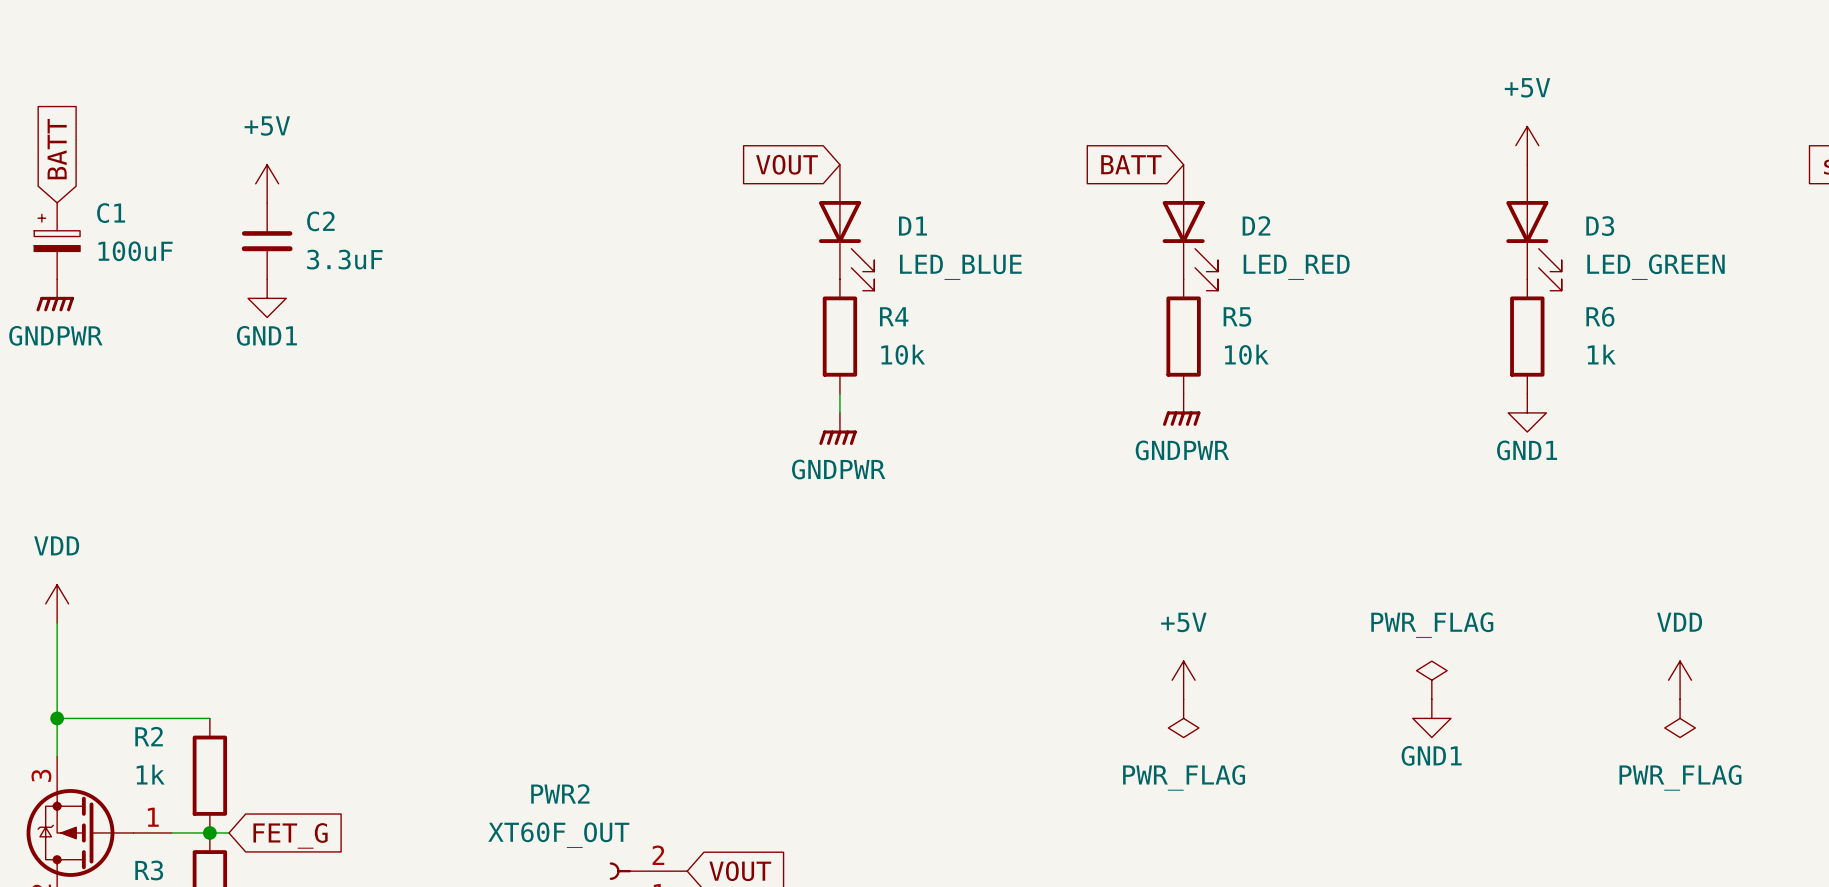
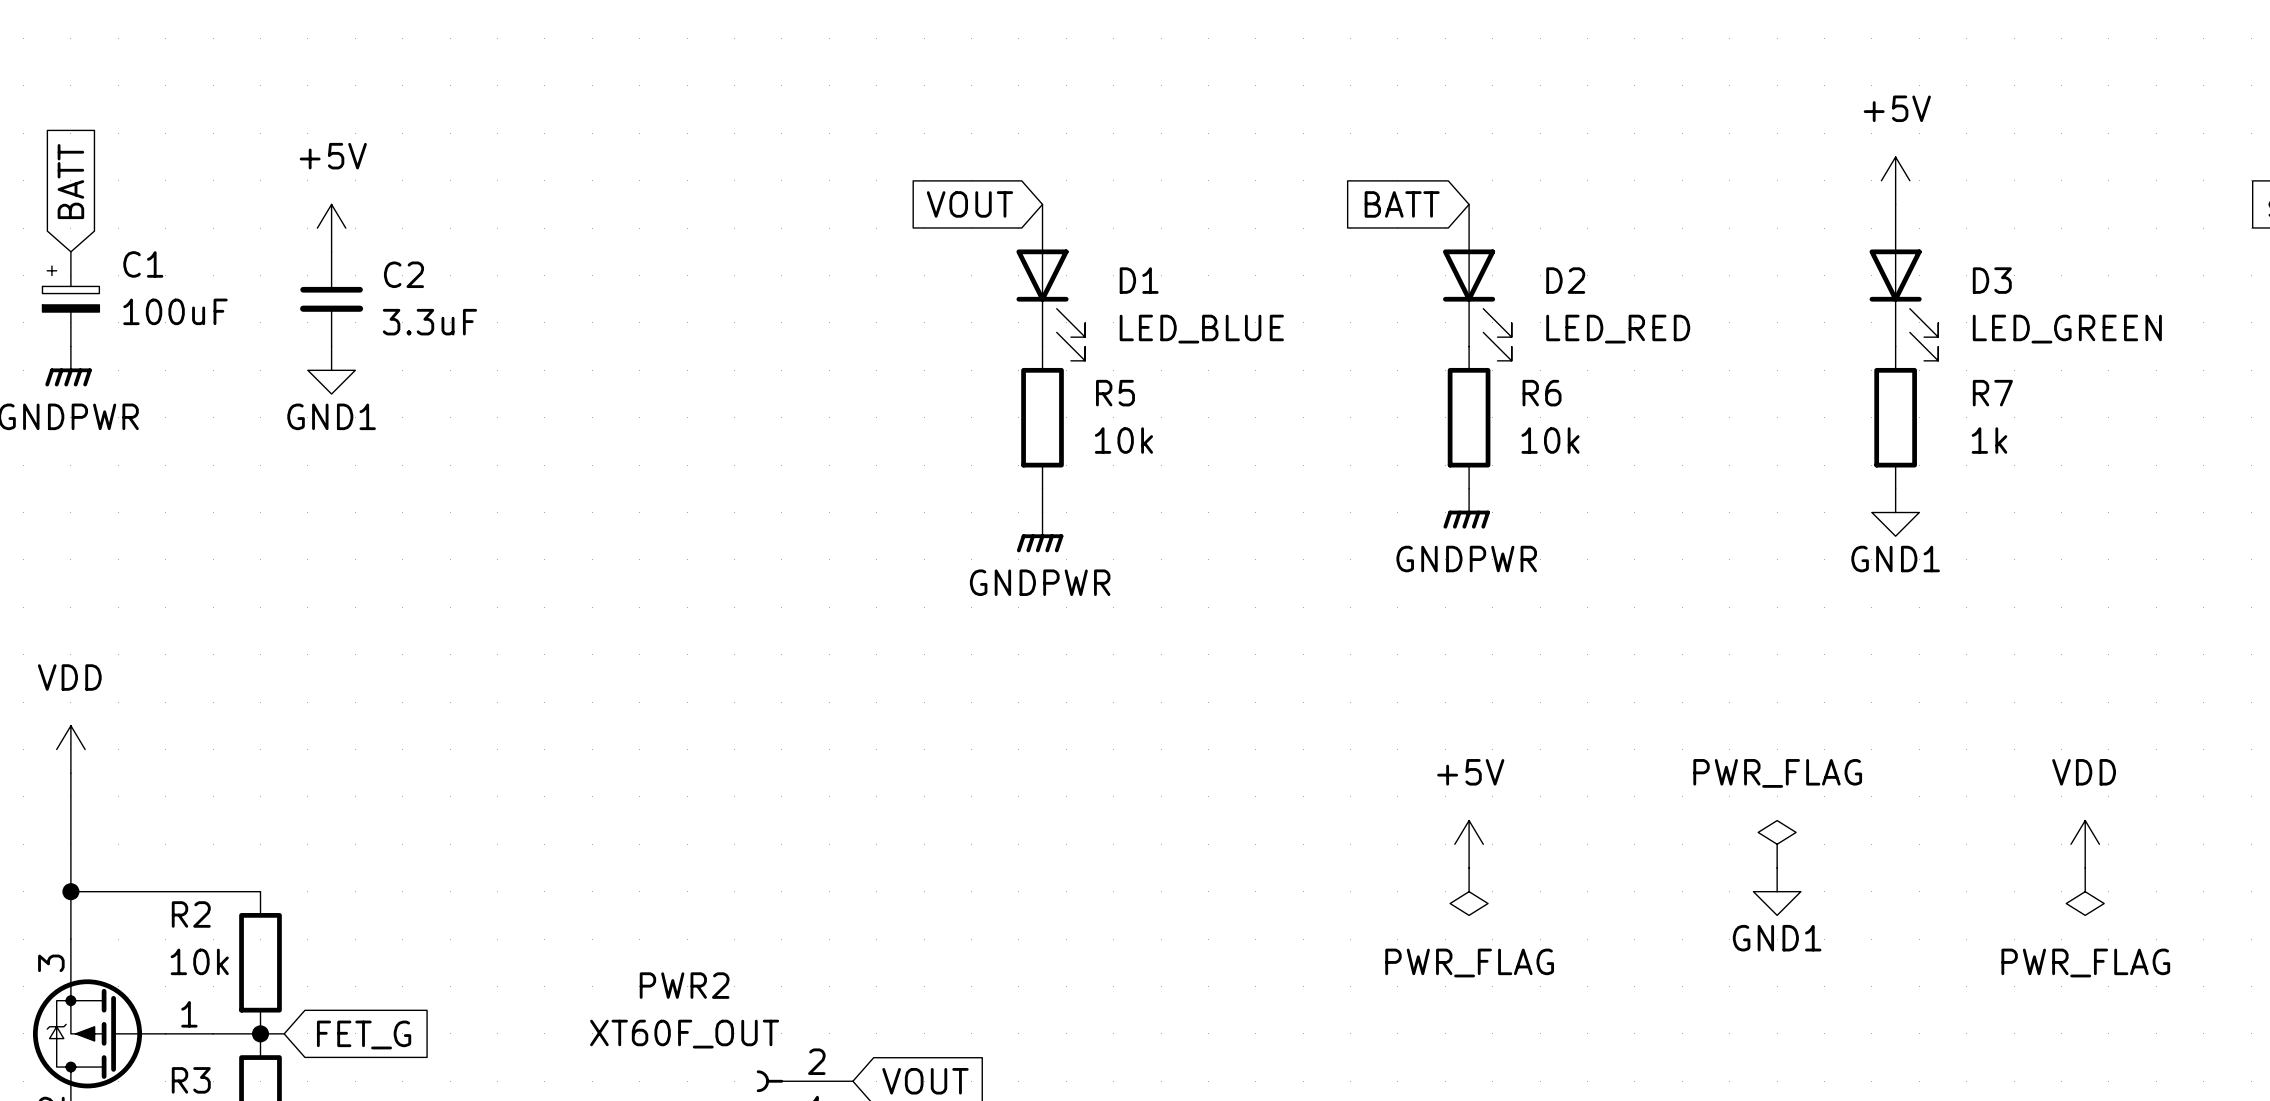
R4 name: R4 (894, 316) -> R5 (1115, 393)
R5 name: R5 (1237, 316) -> R6 (1542, 393)
R6 name: R6 (1600, 316) -> R7 (1992, 393)
R2 value: 1k (150, 774) -> 10k (199, 961)

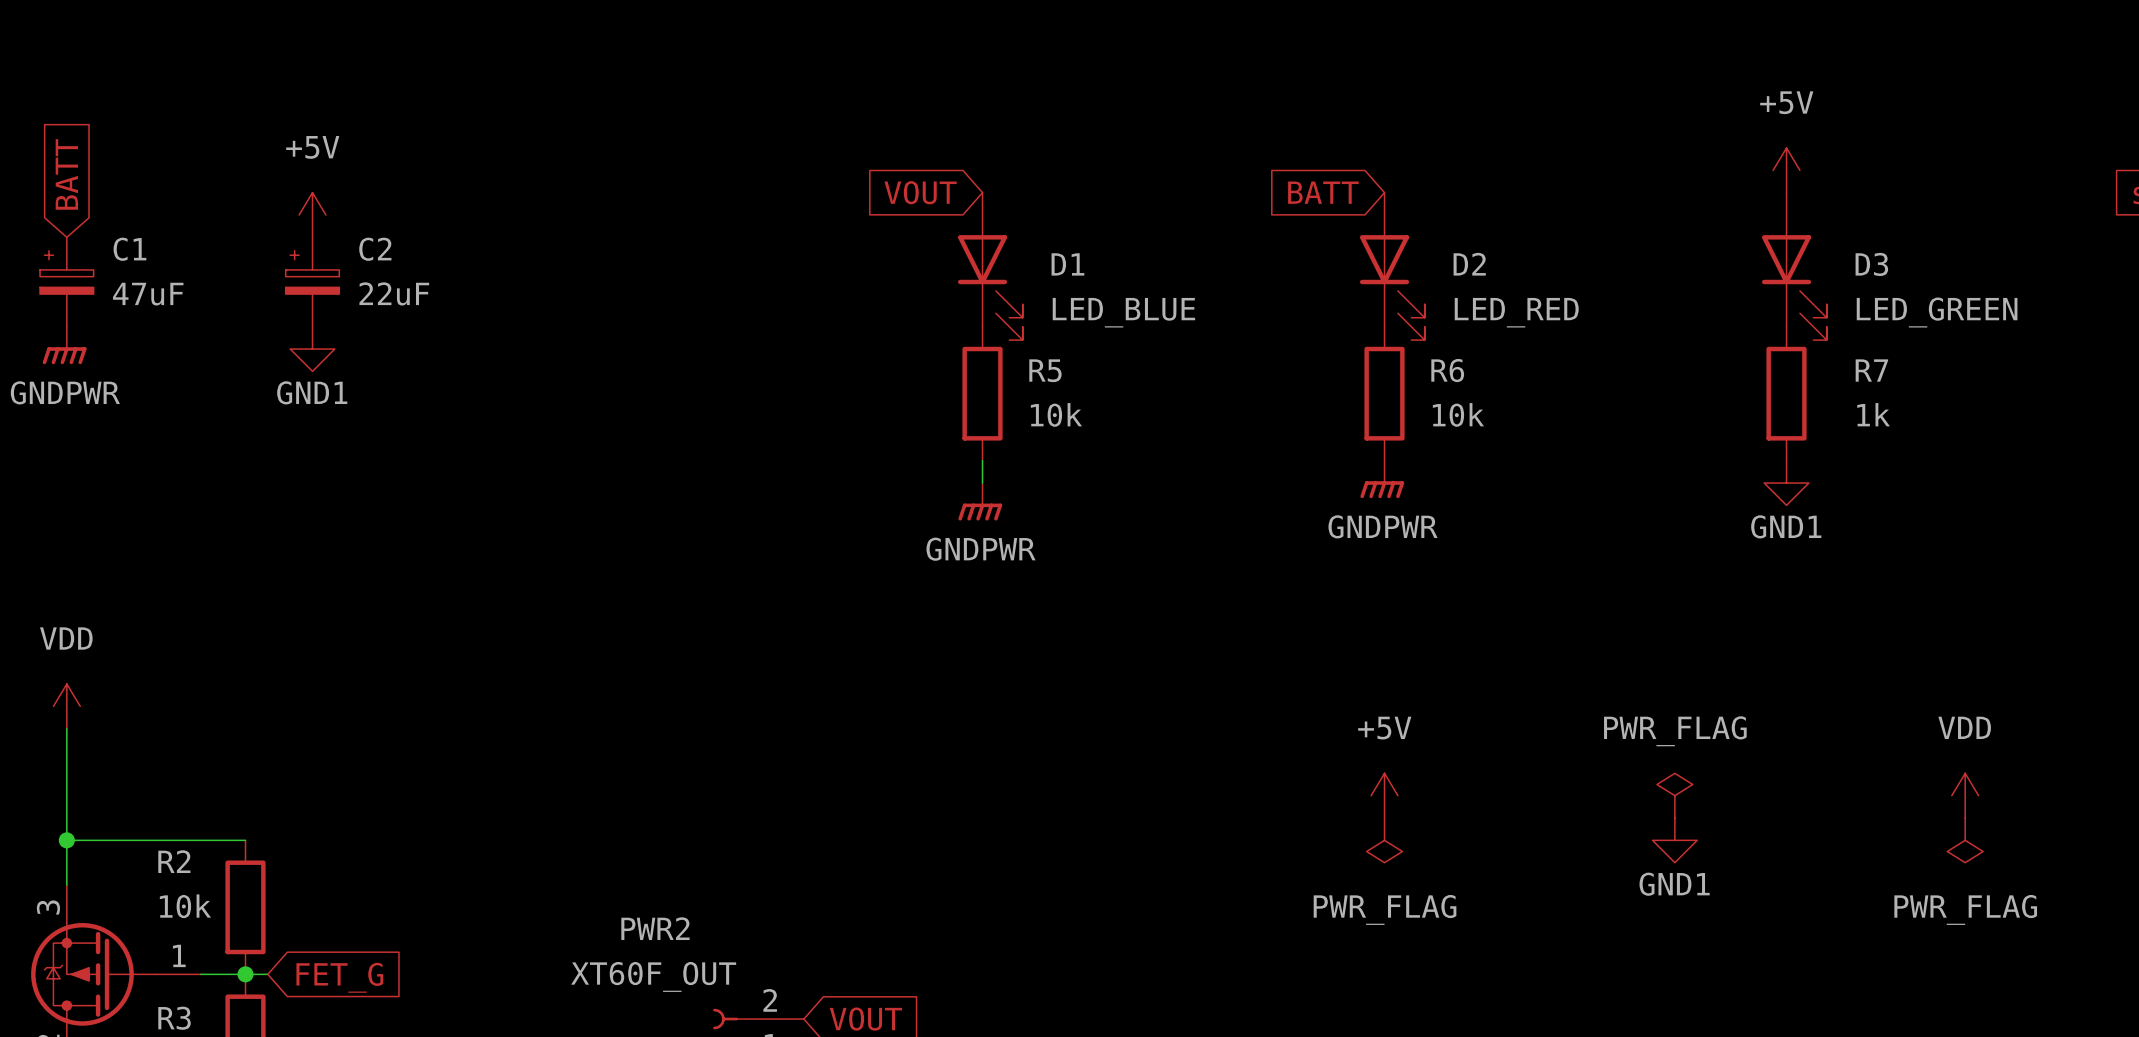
C2 symbol: [300, 251, 364, 347] -> [285, 237, 340, 327]
C1 value: 100uF (175, 311) -> 47uF (148, 294)
C2 value: 3.3uF (429, 322) -> 22uF (394, 293)

